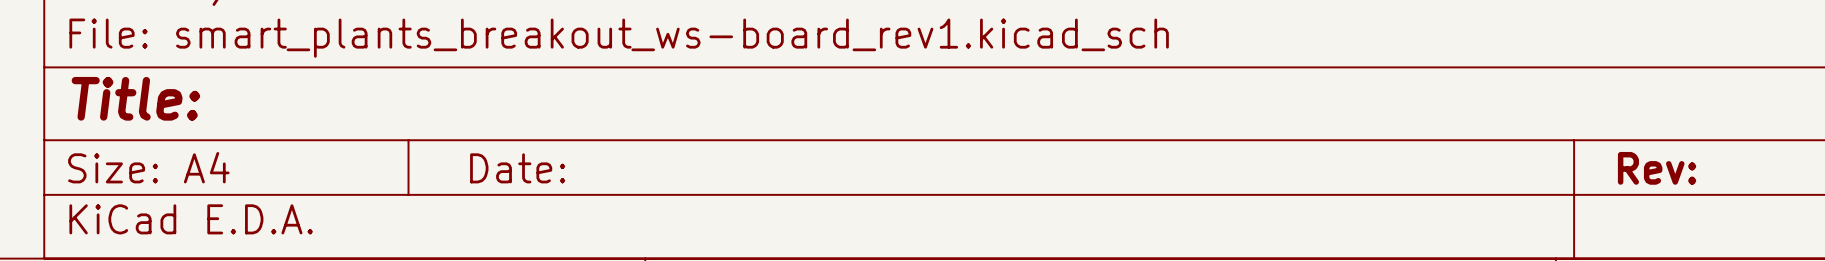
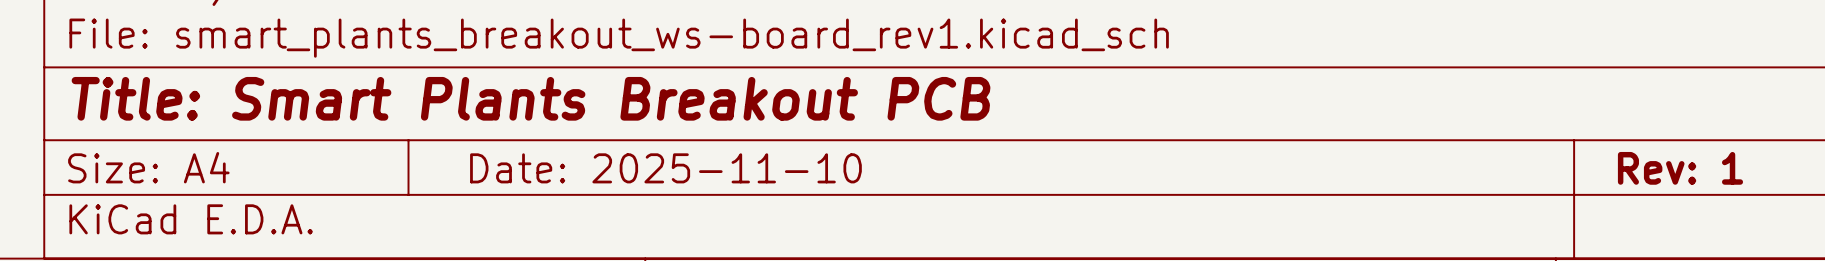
title block: Title: (135, 98) -> Title: Smart Plants Breakout PCB (531, 98)
title block: Date: (517, 168) -> Date: 2025-11-10 (665, 168)
title block: Rev: (1657, 168) -> Rev: 1 (1680, 168)

